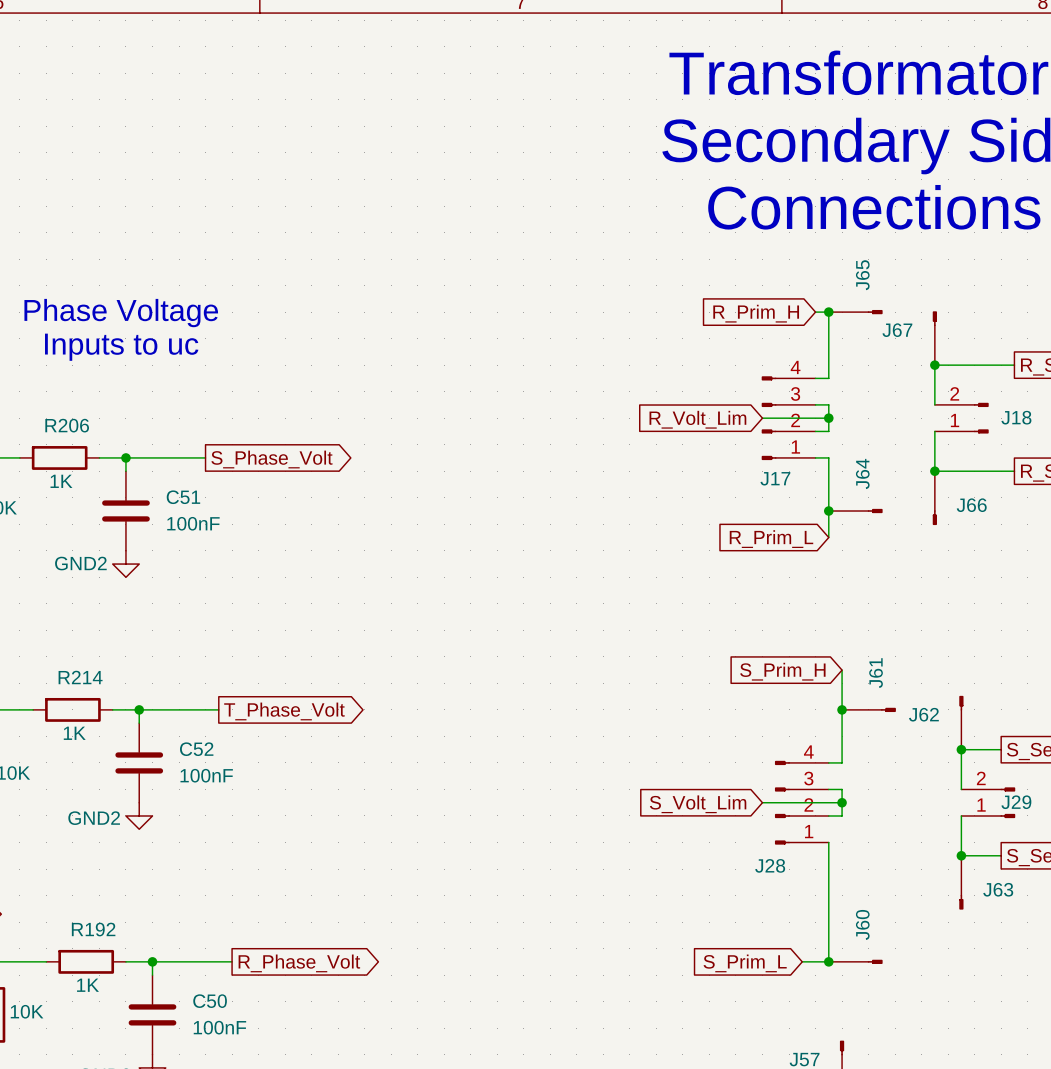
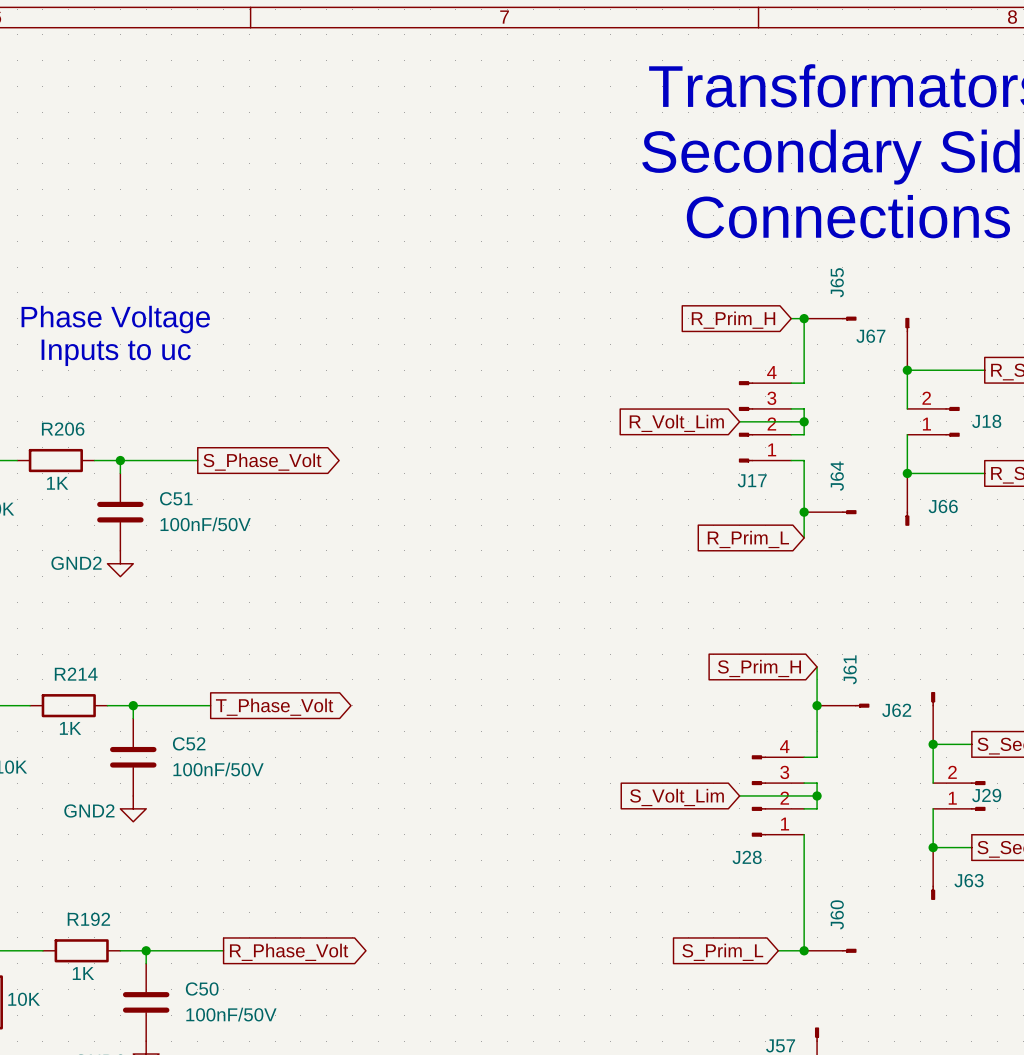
C51 value: 100nF (193, 523) -> 100nF/50V (205, 524)
C52 value: 100nF (206, 775) -> 100nF/50V (218, 769)
C50 value: 100nF (219, 1027) -> 100nF/50V (231, 1014)

